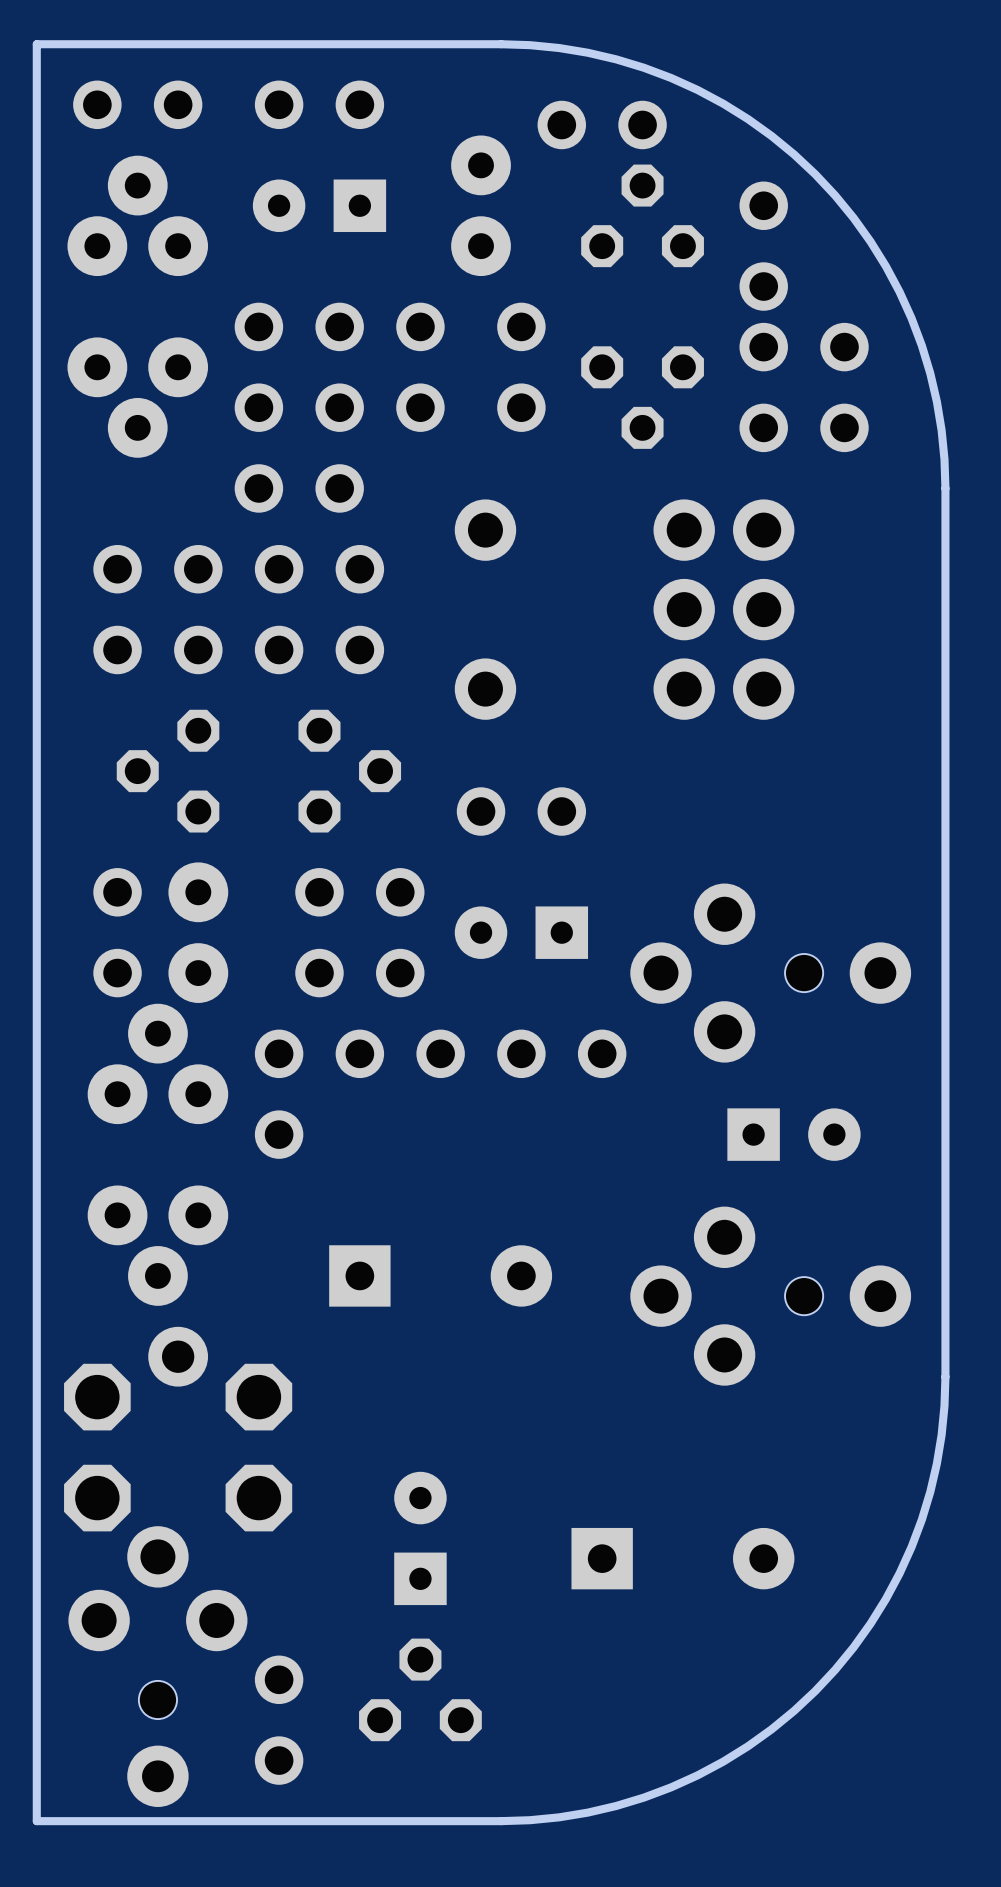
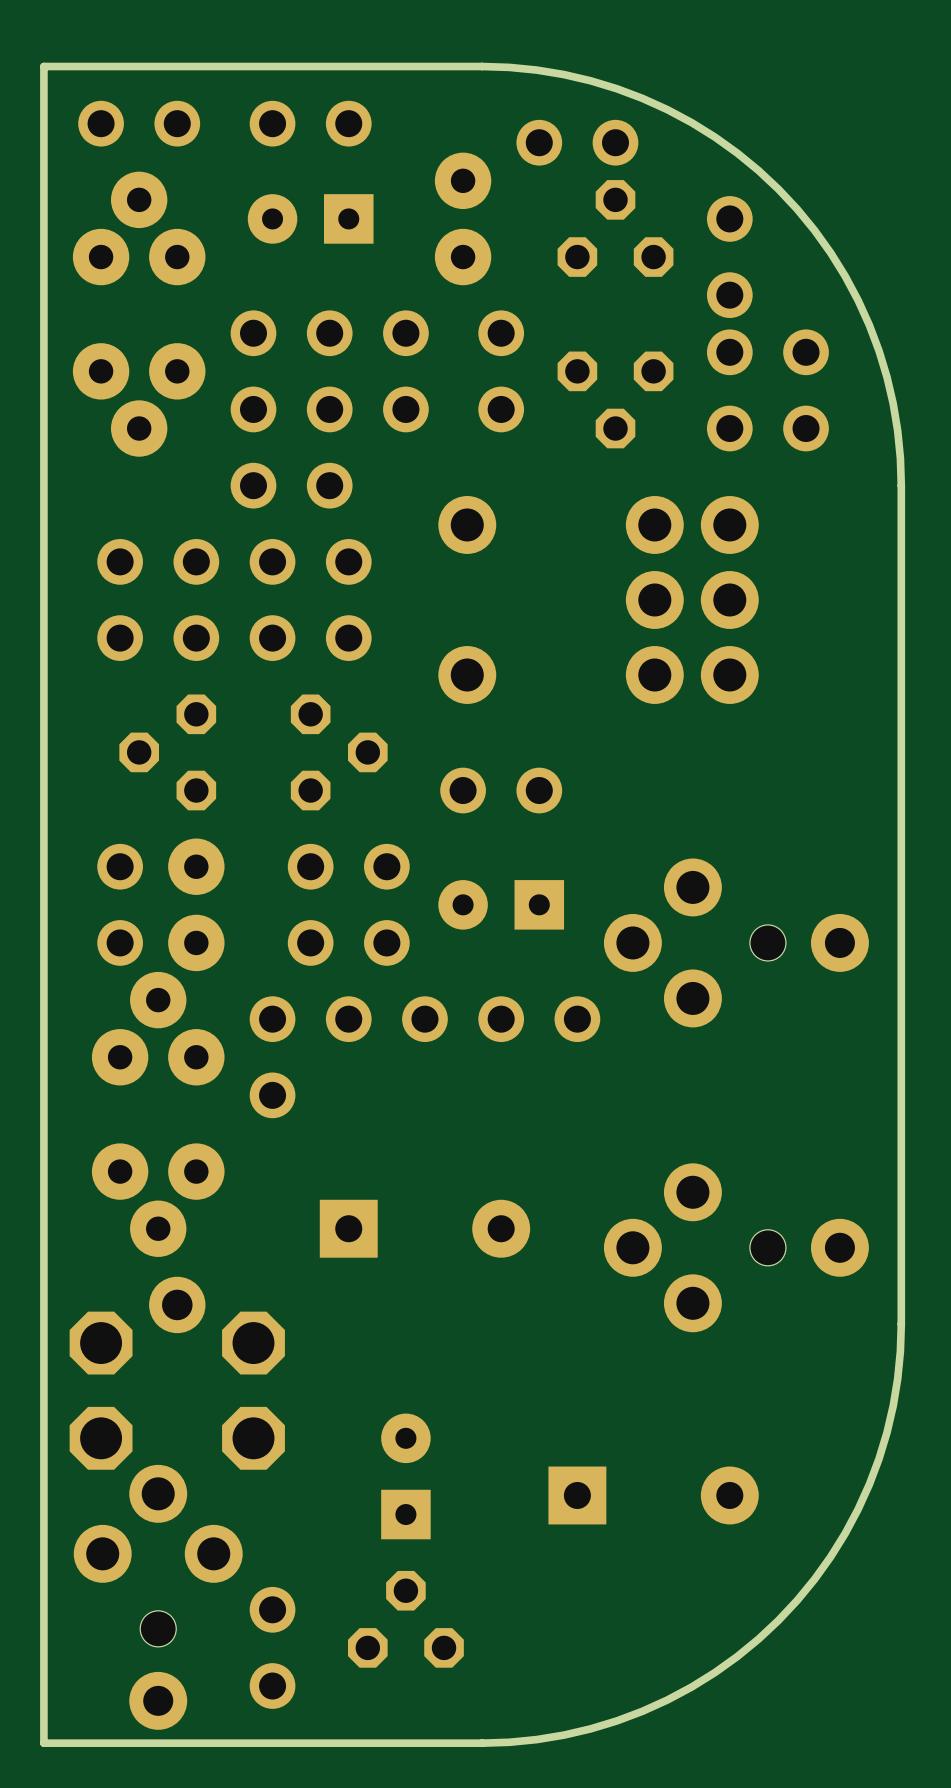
part: (794, 1134) -> none

